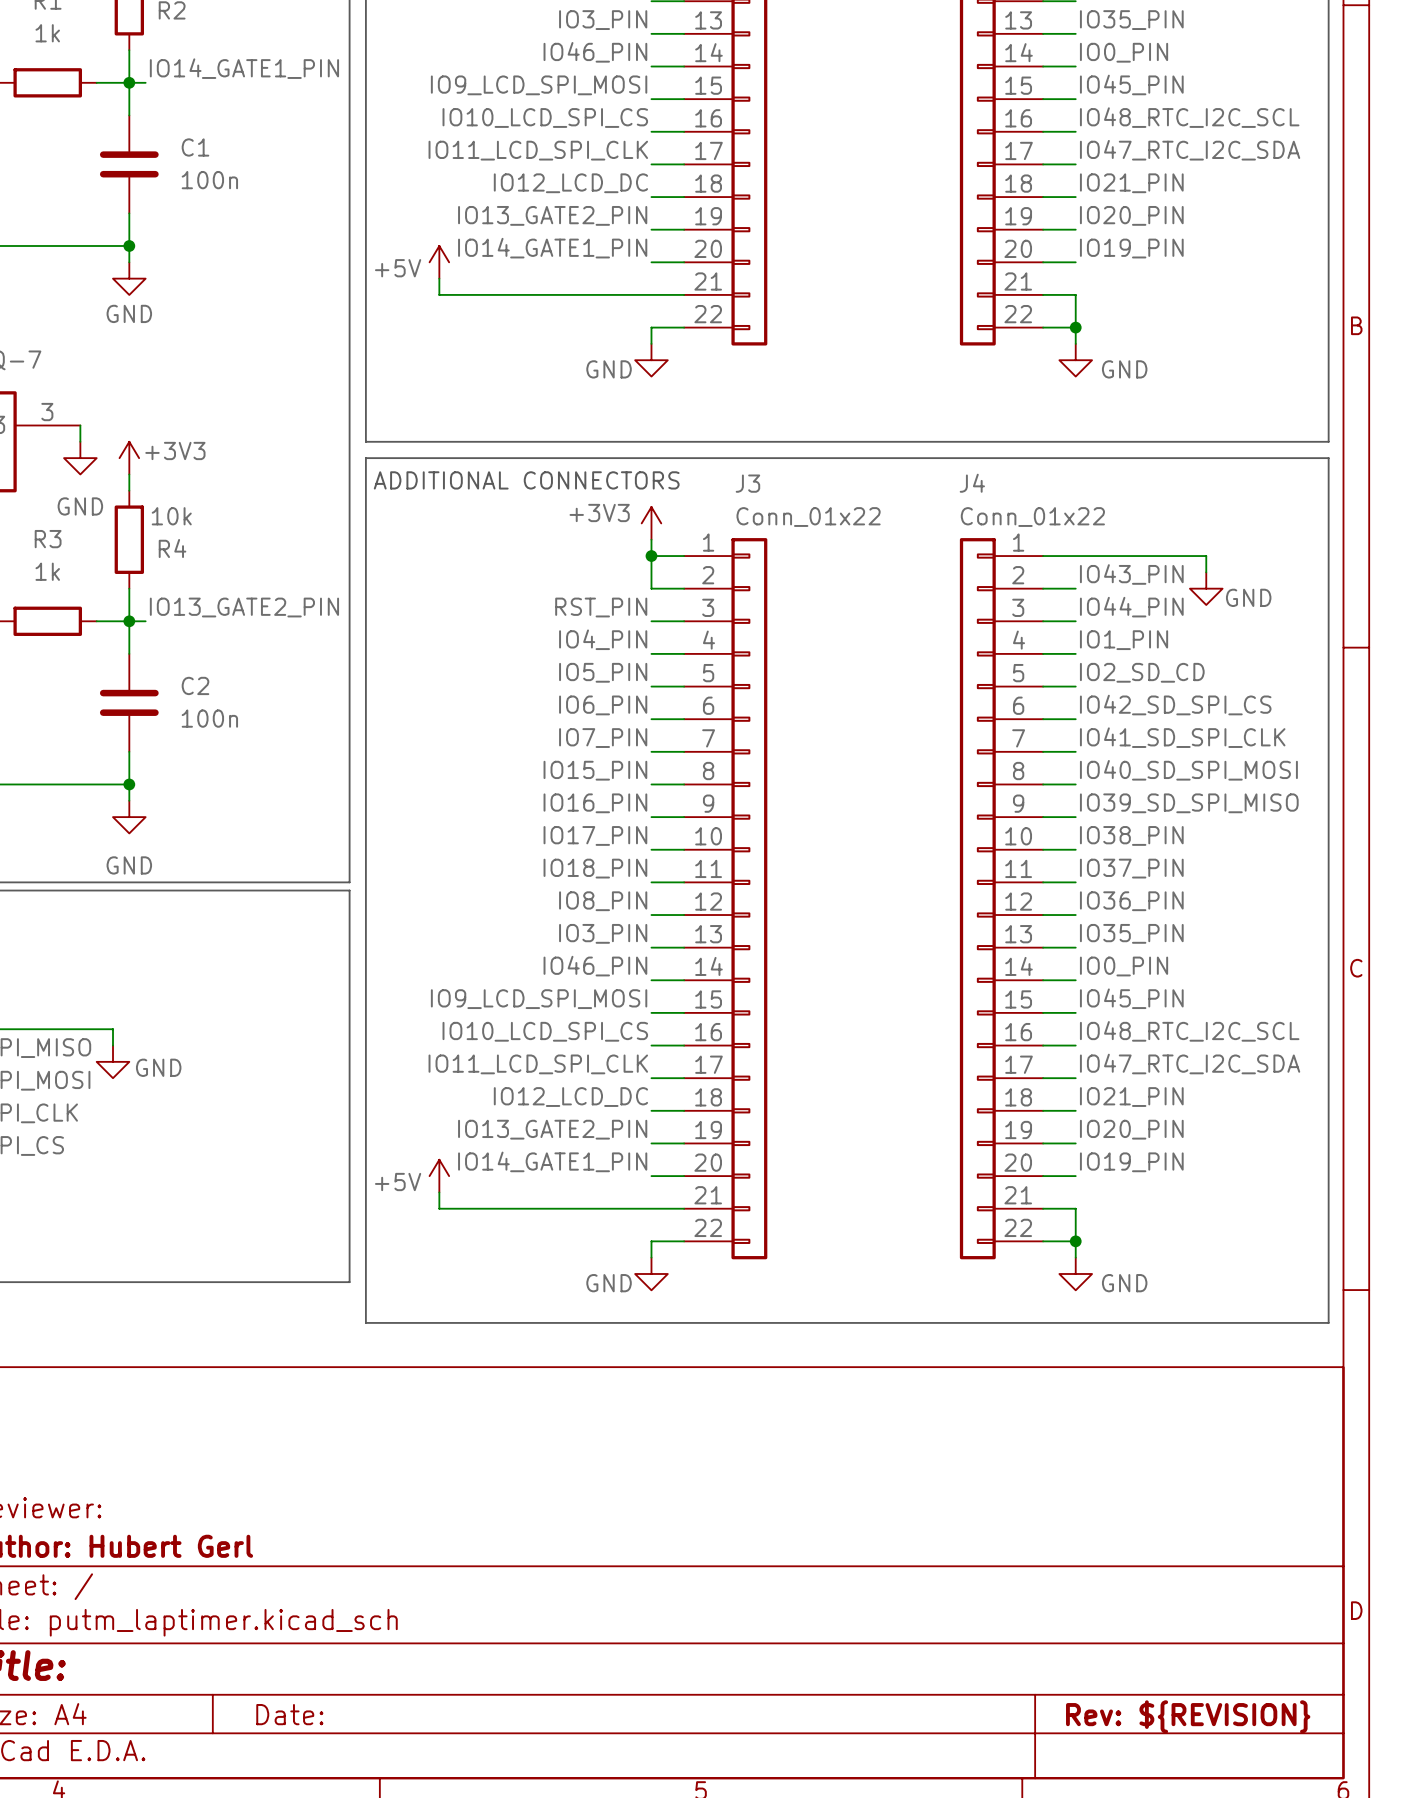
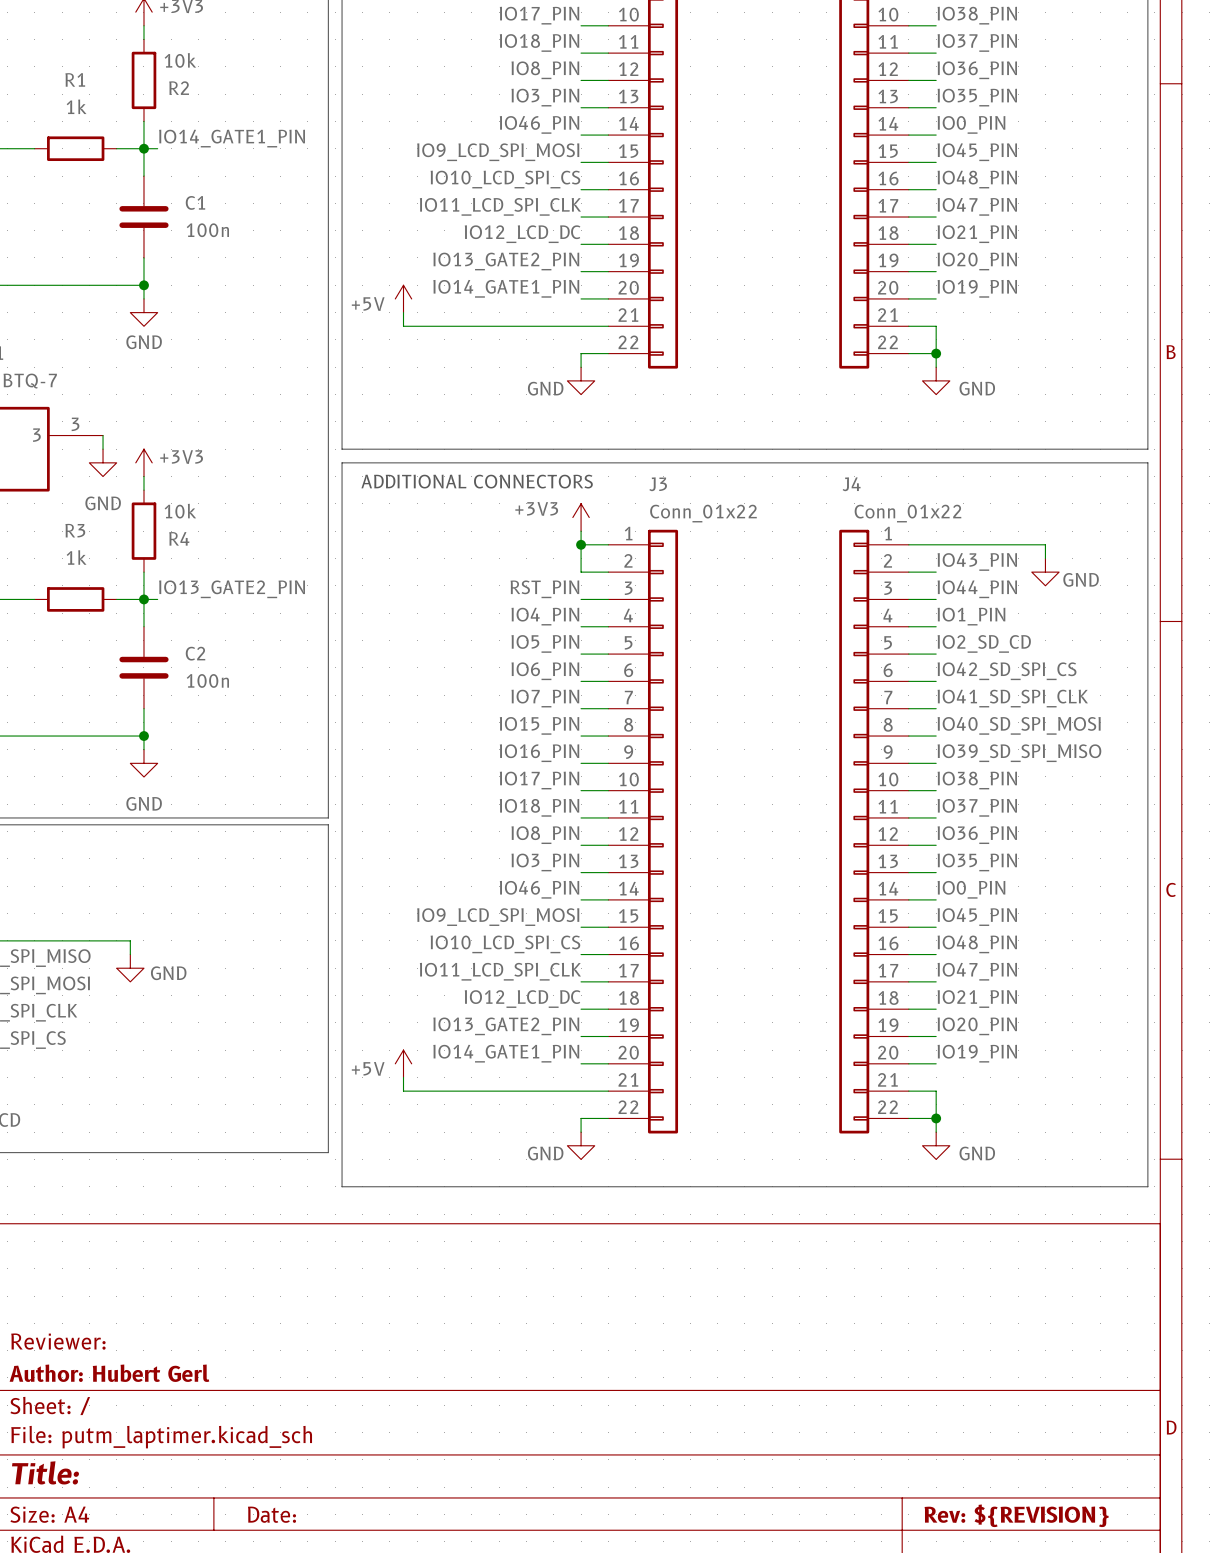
label: IO48_RTC_I2C_SCL (1189, 117) -> IO48_PIN (977, 179)
label: IO47_RTC_I2C_SDA (1190, 150) -> IO47_PIN (977, 206)
label: IO48_RTC_I2C_SCL (1189, 1031) -> IO48_PIN (977, 944)
label: IO47_RTC_I2C_SDA (1190, 1064) -> IO47_PIN (977, 971)

